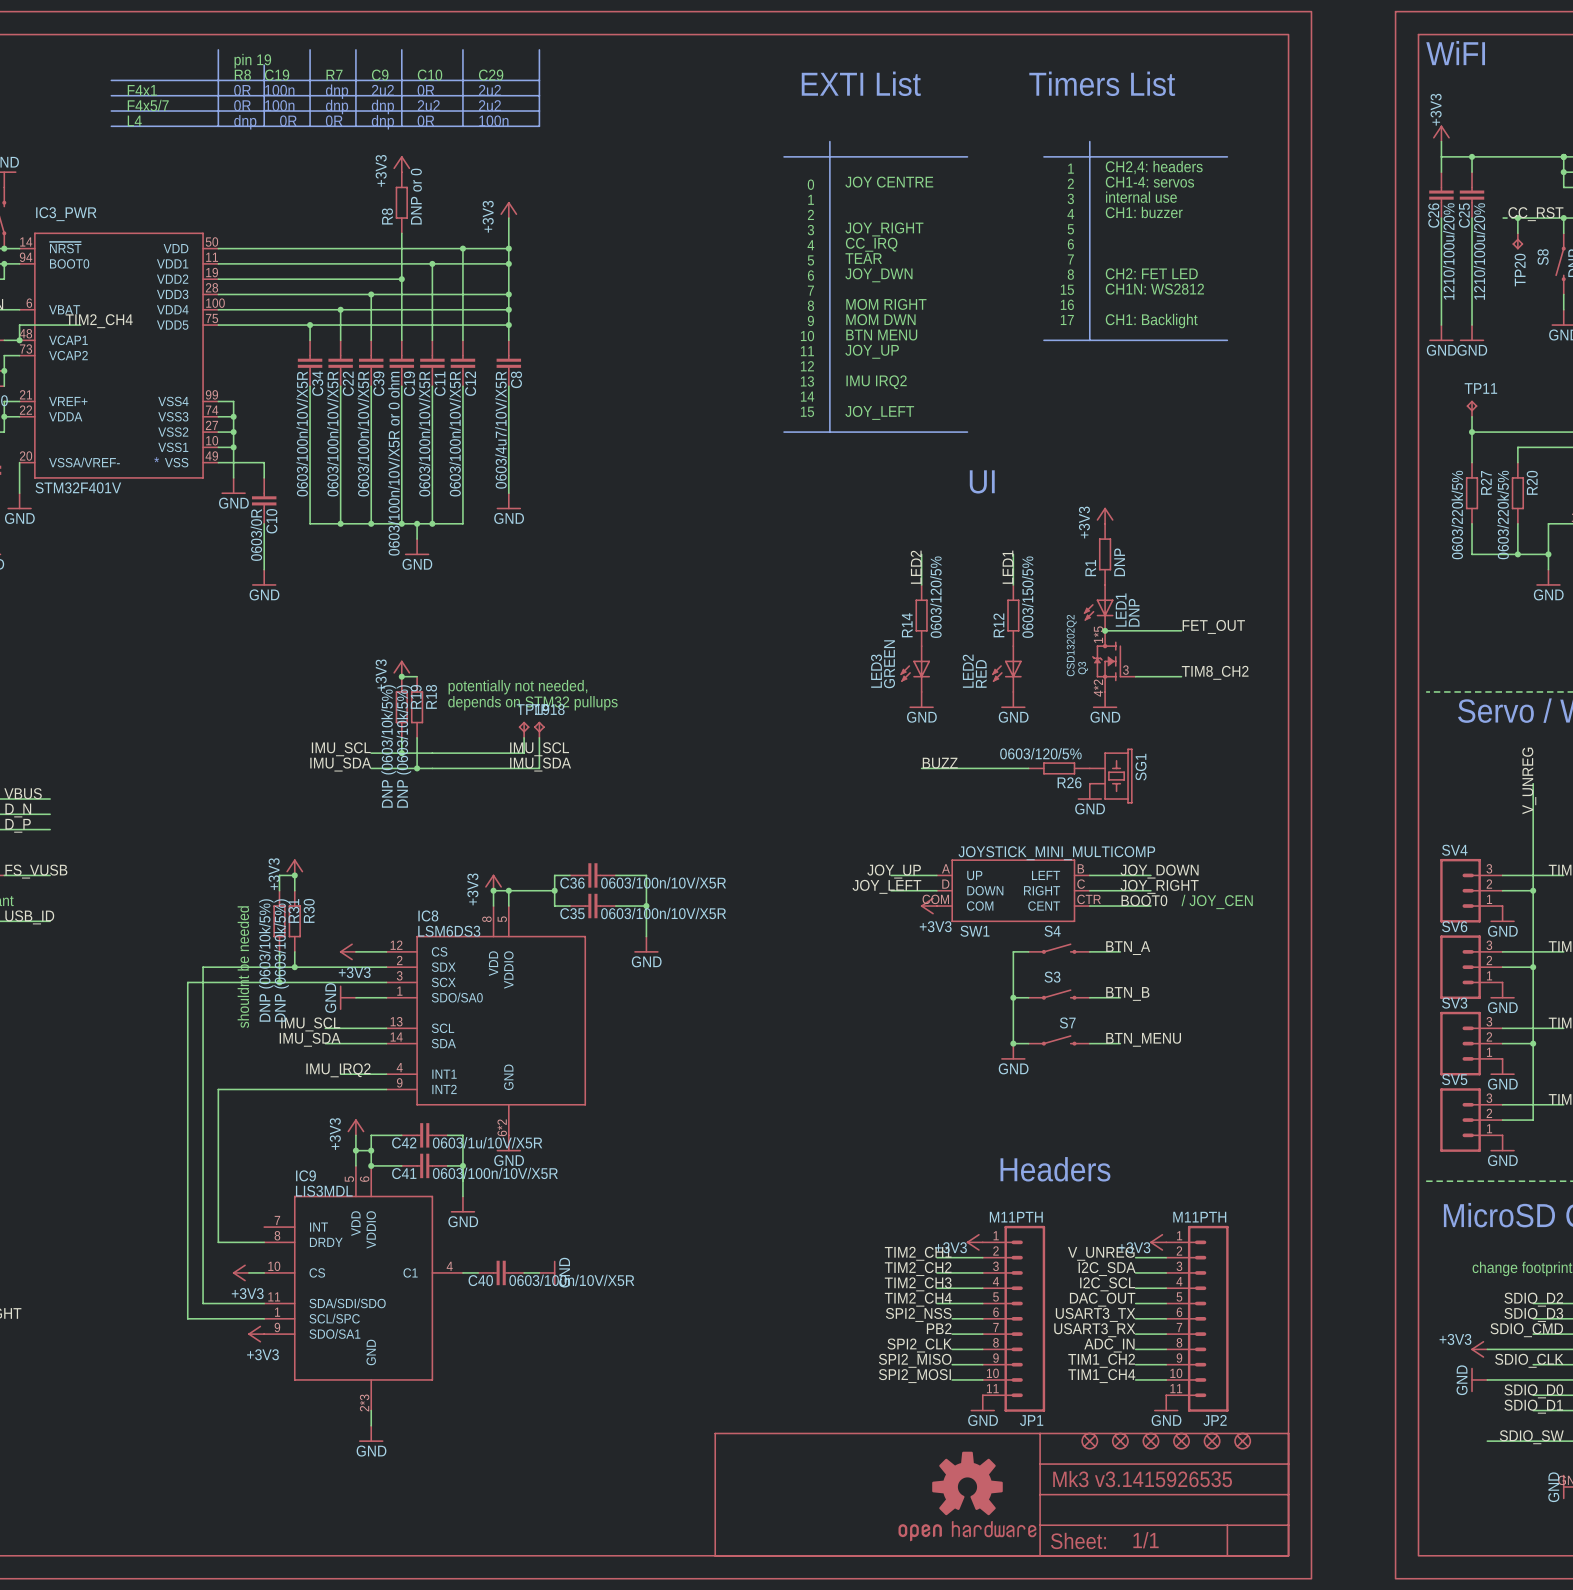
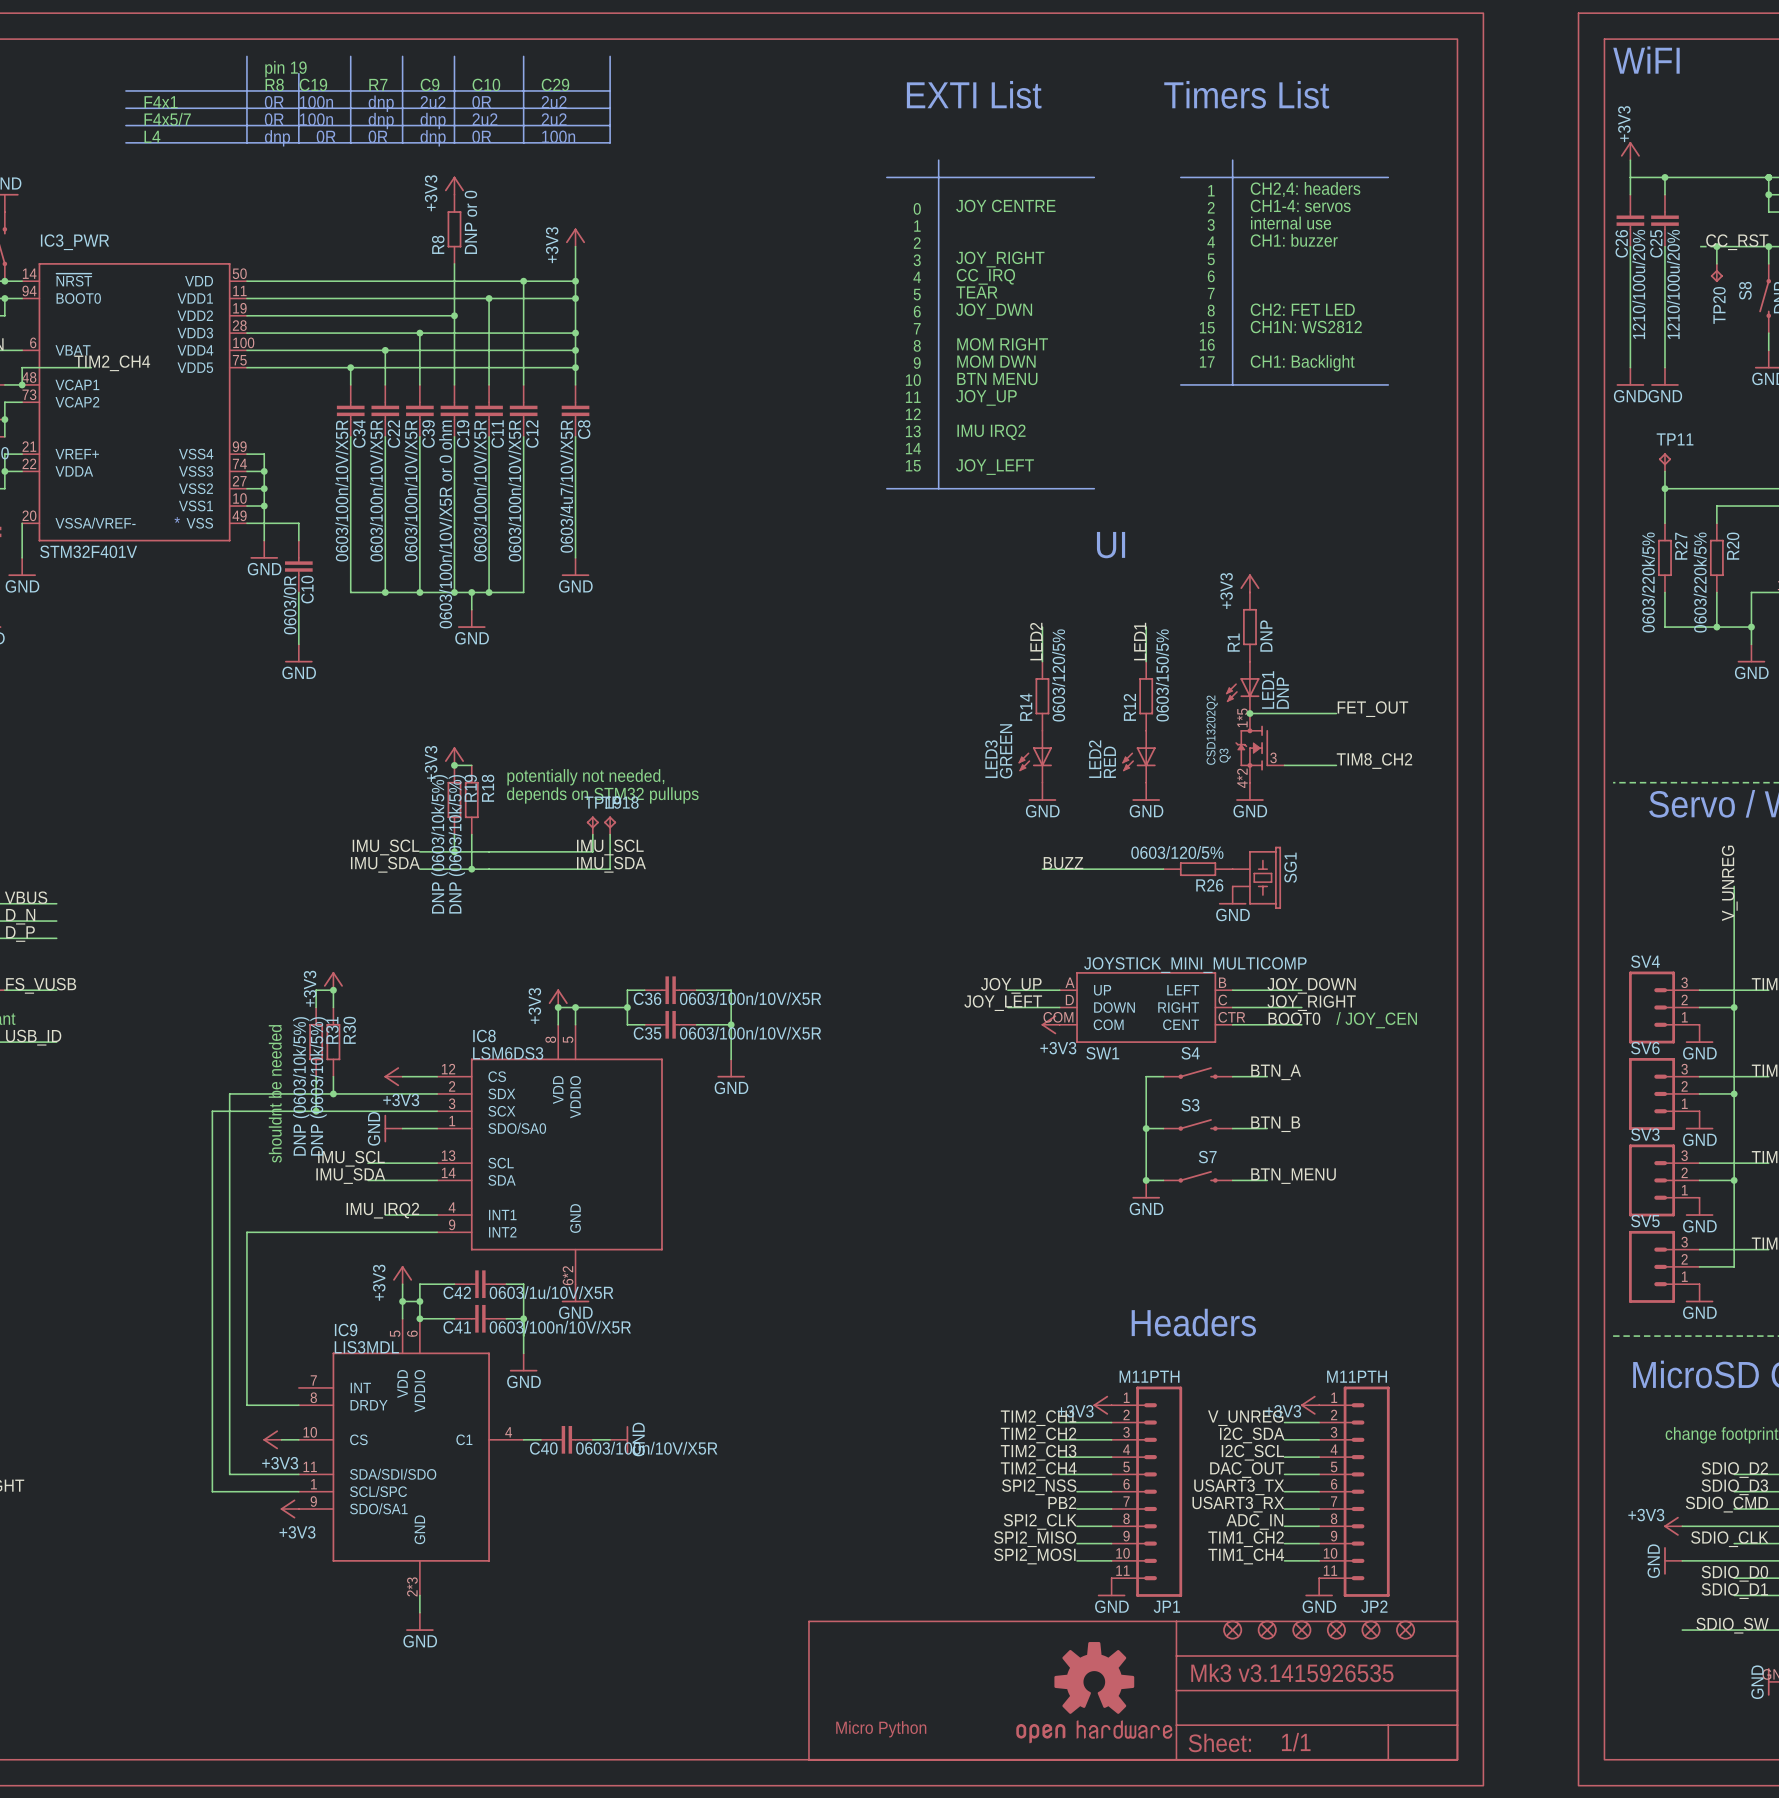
part: none -> (881, 1729)

